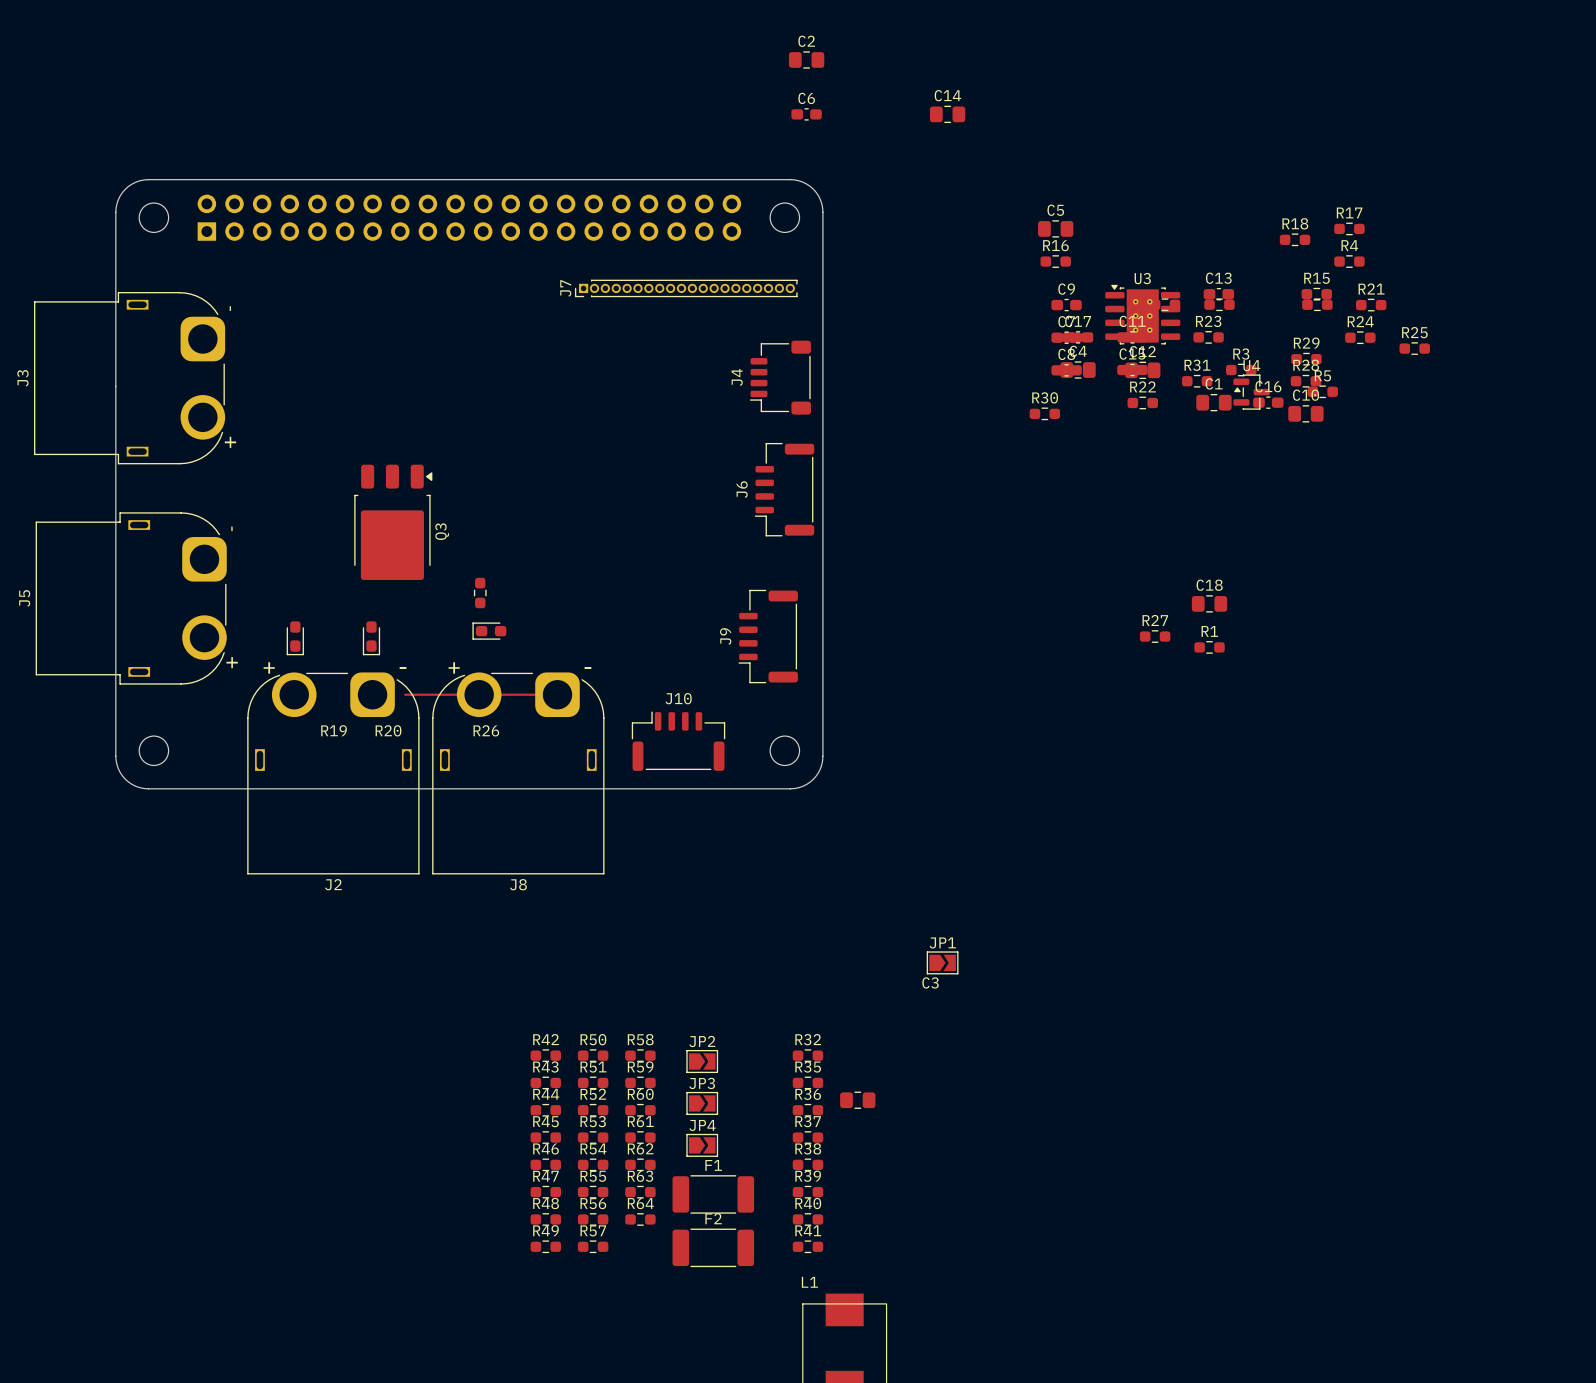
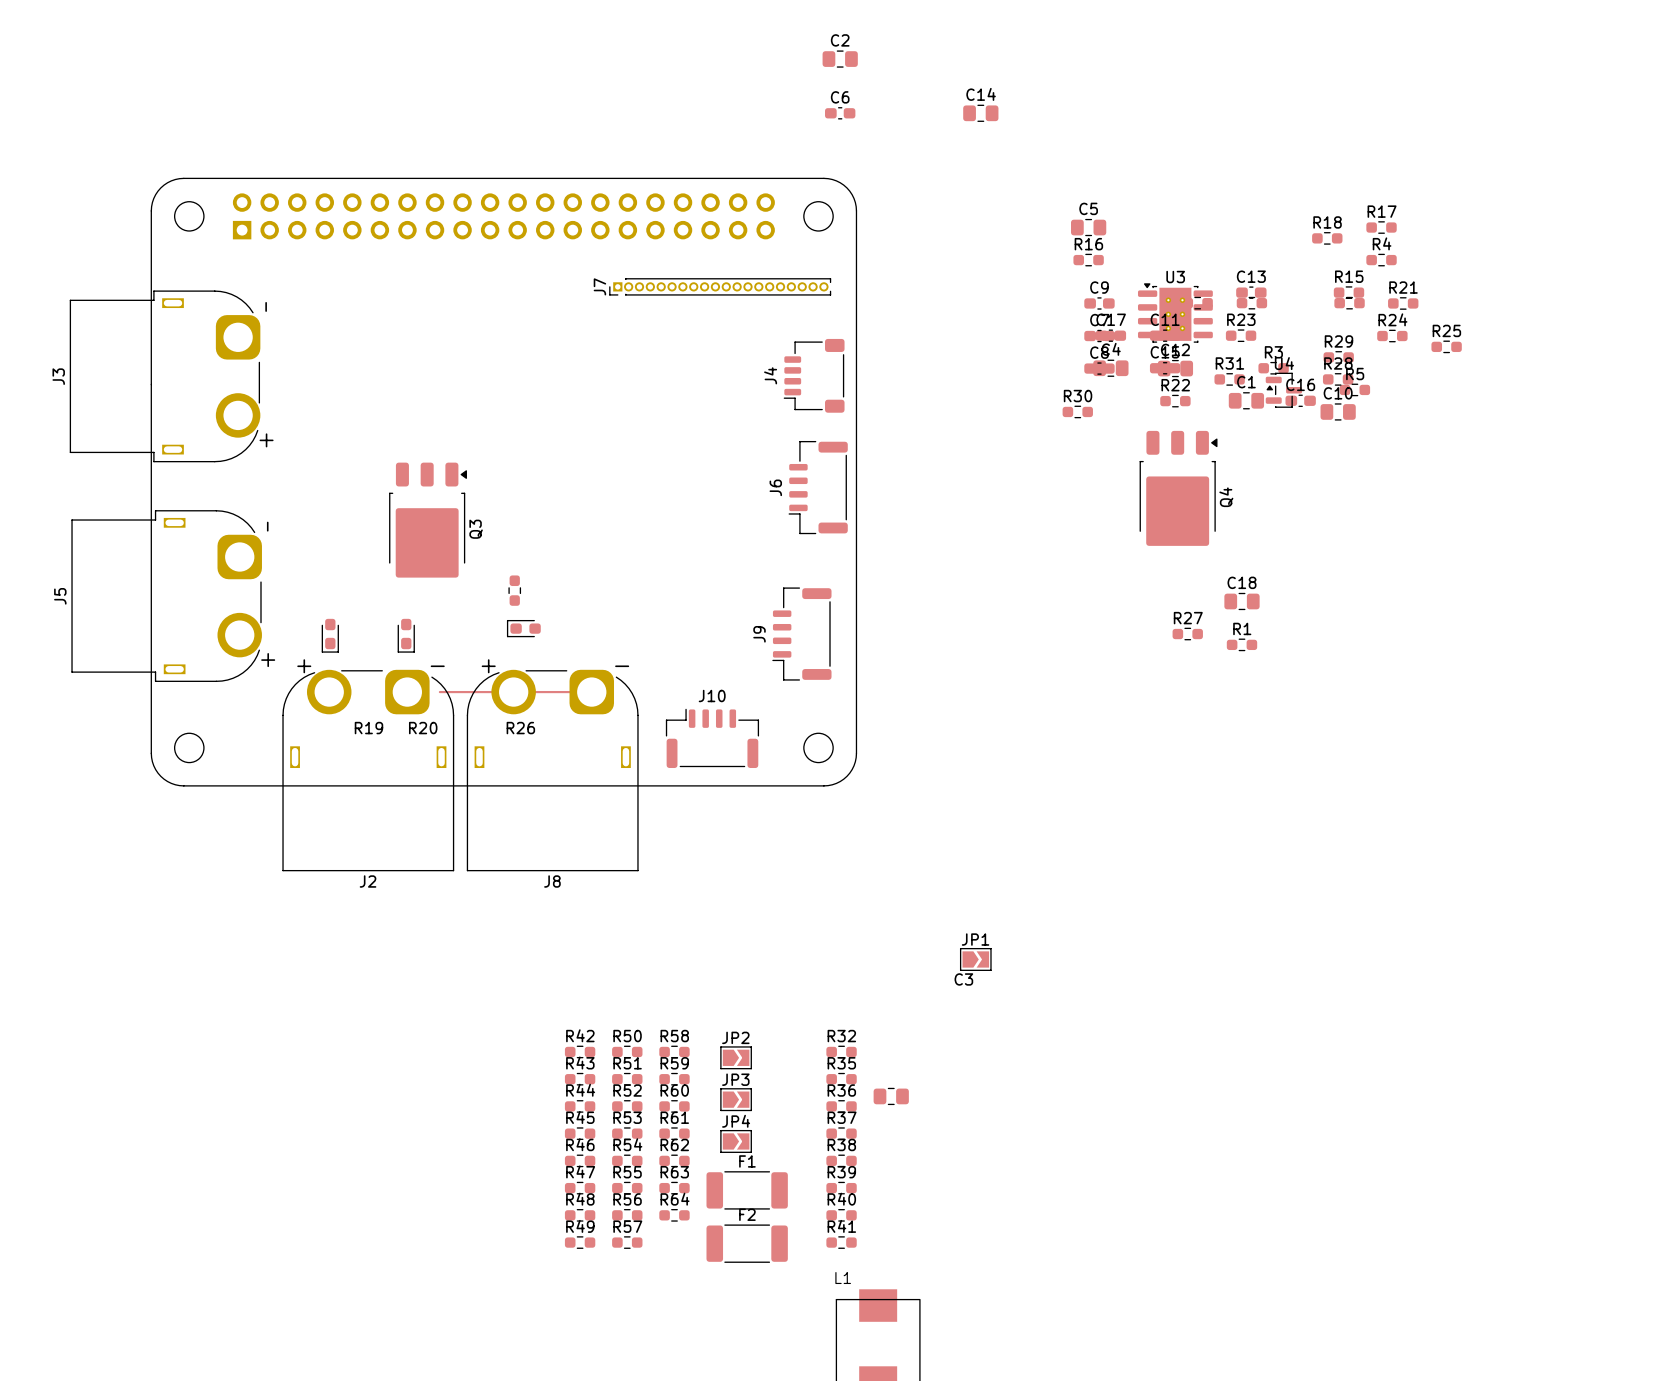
Q4: none -> (1178, 488)

